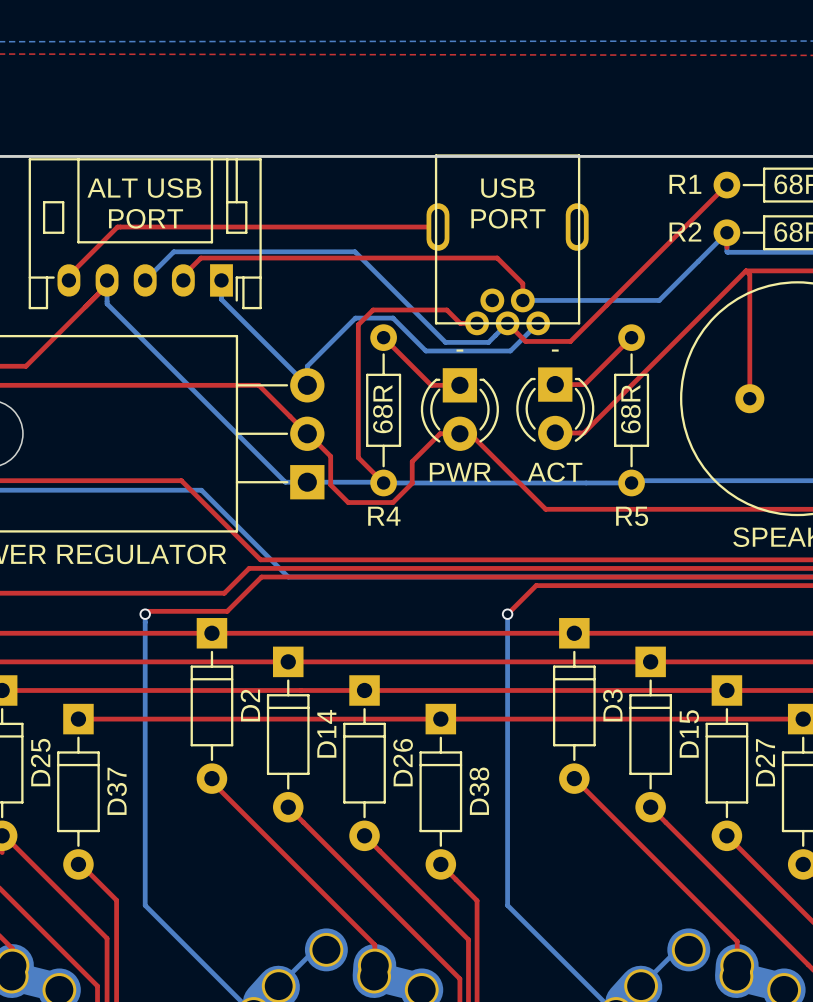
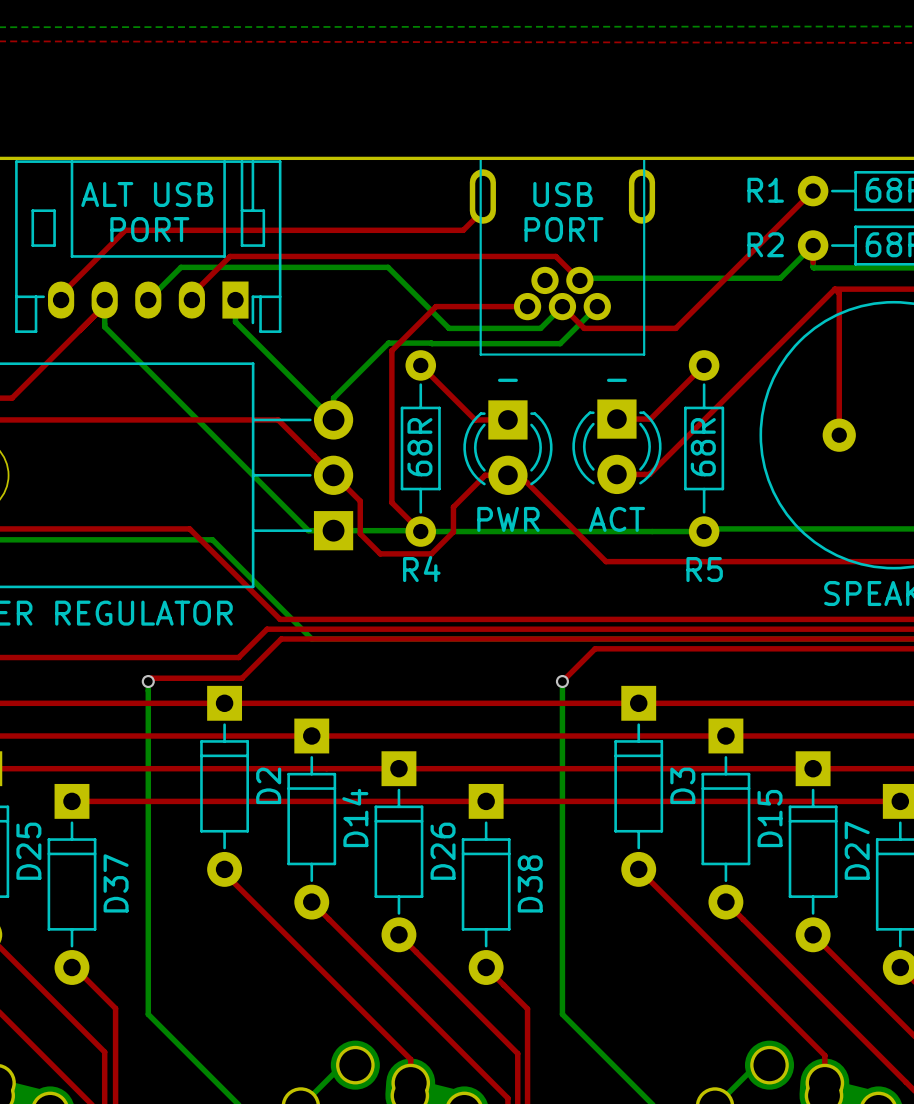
part footprint: [426, 154, 589, 336] -> [469, 157, 656, 356]
top track: (117, 227) (437, 227) -> (116, 239) (125, 230) (463, 230) (482, 210) (482, 196)
top track: (200, 258) (497, 258) (522, 283) (522, 300) -> (212, 274) (230, 256) (555, 256) (579, 280)
bottom track: (698, 261) (659, 300) (522, 300) -> (780, 278) (582, 278) (579, 280)
bottom track: (408, 305) (445, 342) (488, 342) (507, 323) -> (449, 328) (540, 328) (562, 306)
top track: (606, 305) (570, 341) (525, 341) (507, 323) -> (675, 328) (584, 328) (562, 306)
top track: (373, 309) (446, 309) (460, 323) (477, 323) -> (408, 333) (436, 306) (527, 306)
bottom track: (393, 318) (425, 350) (510, 350) (538, 323) -> (432, 343) (560, 343) (597, 306)

